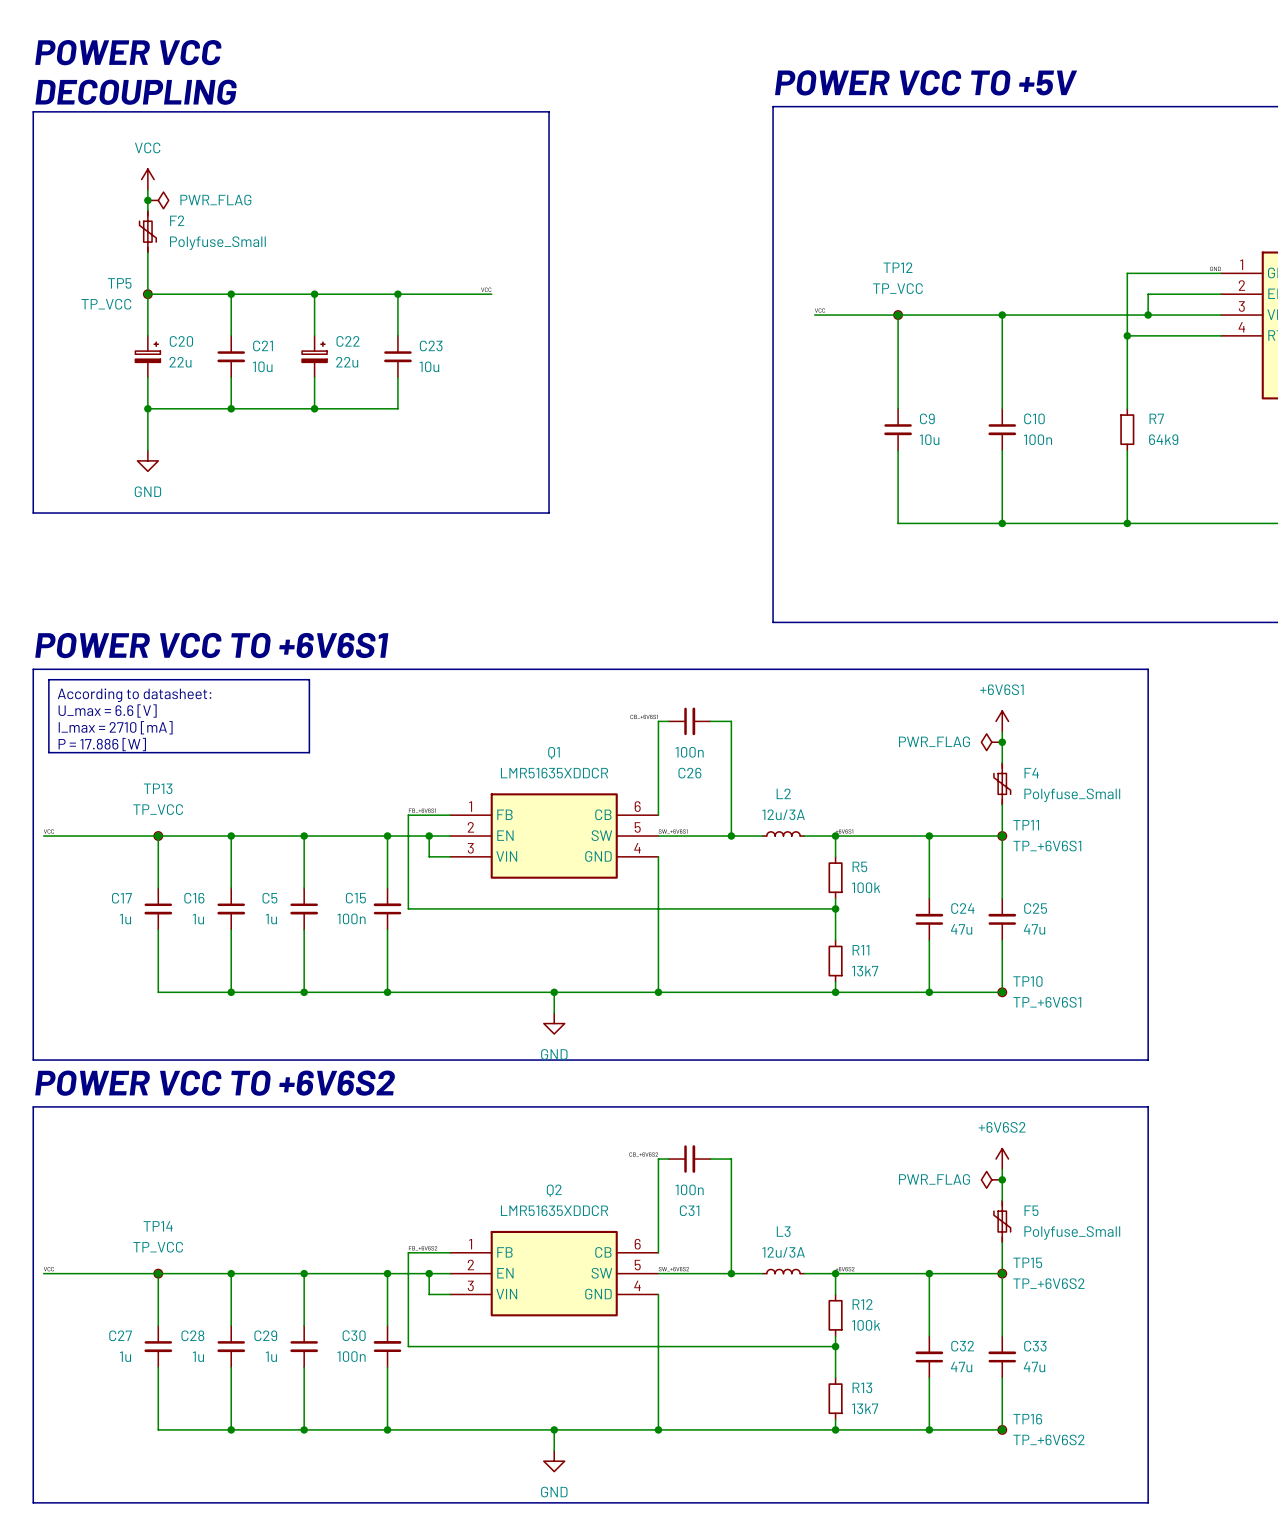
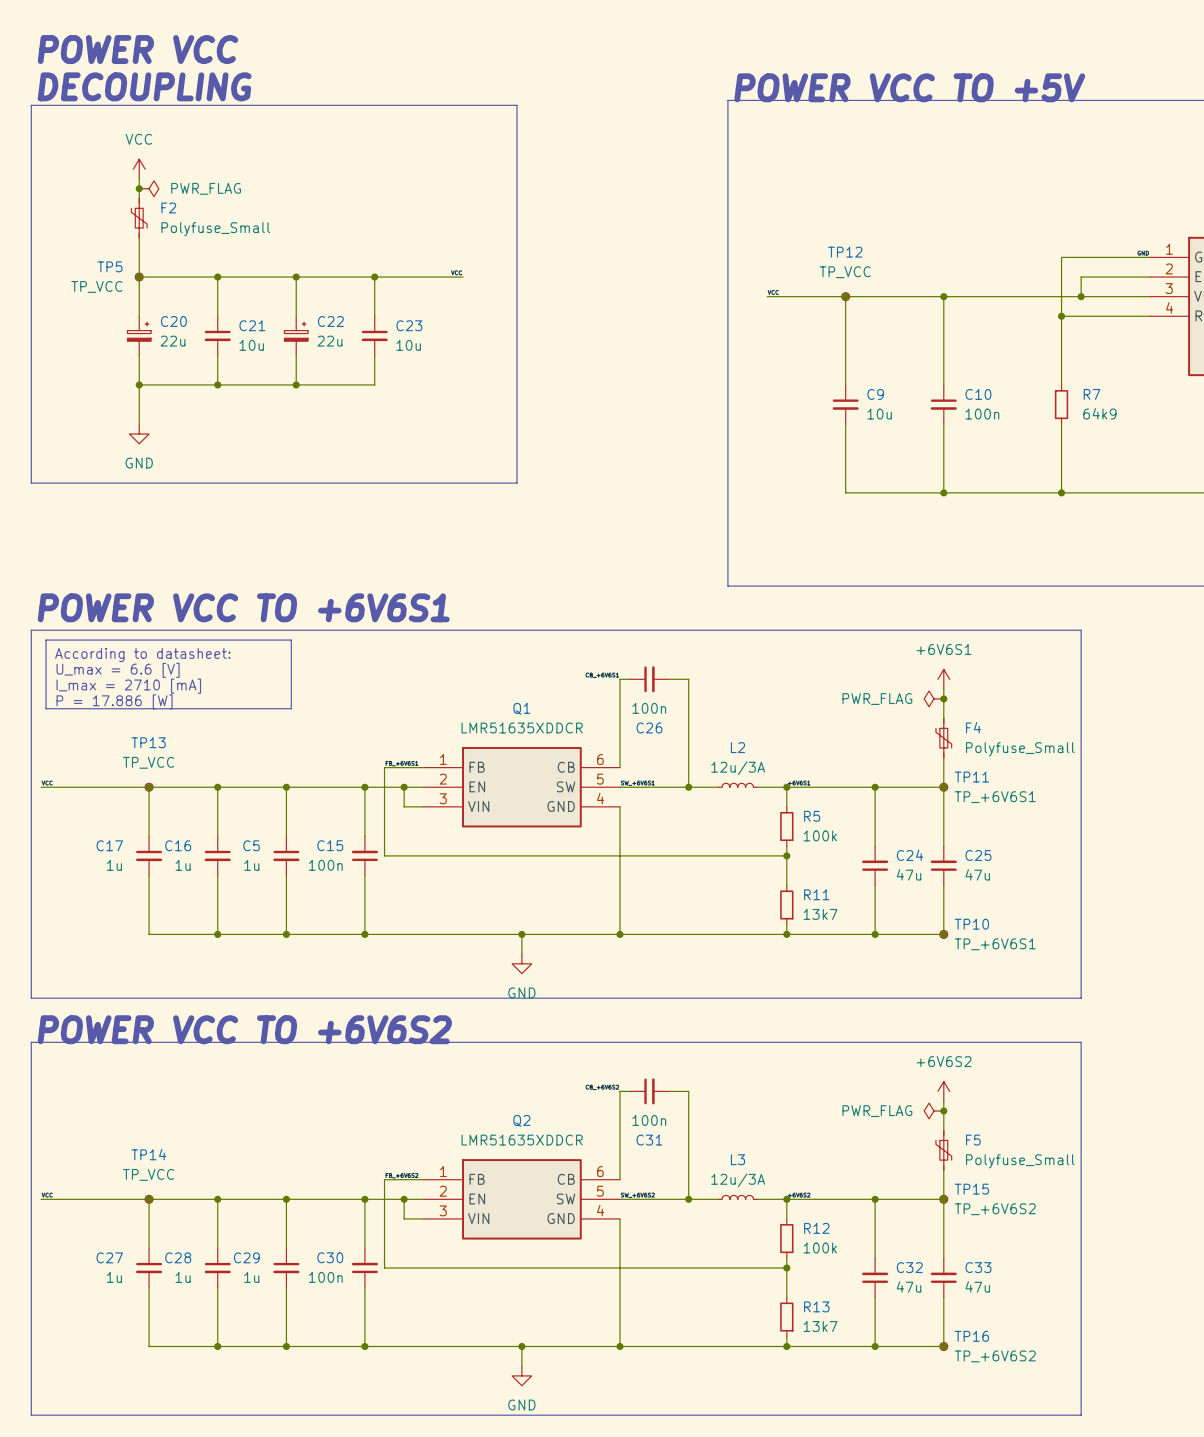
text position: POWER VCC TO +5V (926, 82) -> POWER VCC TO +5V (909, 87)
text position: POWER VCC TO +6V6S2 (215, 1083) -> POWER VCC TO +6V6S2 (244, 1029)

